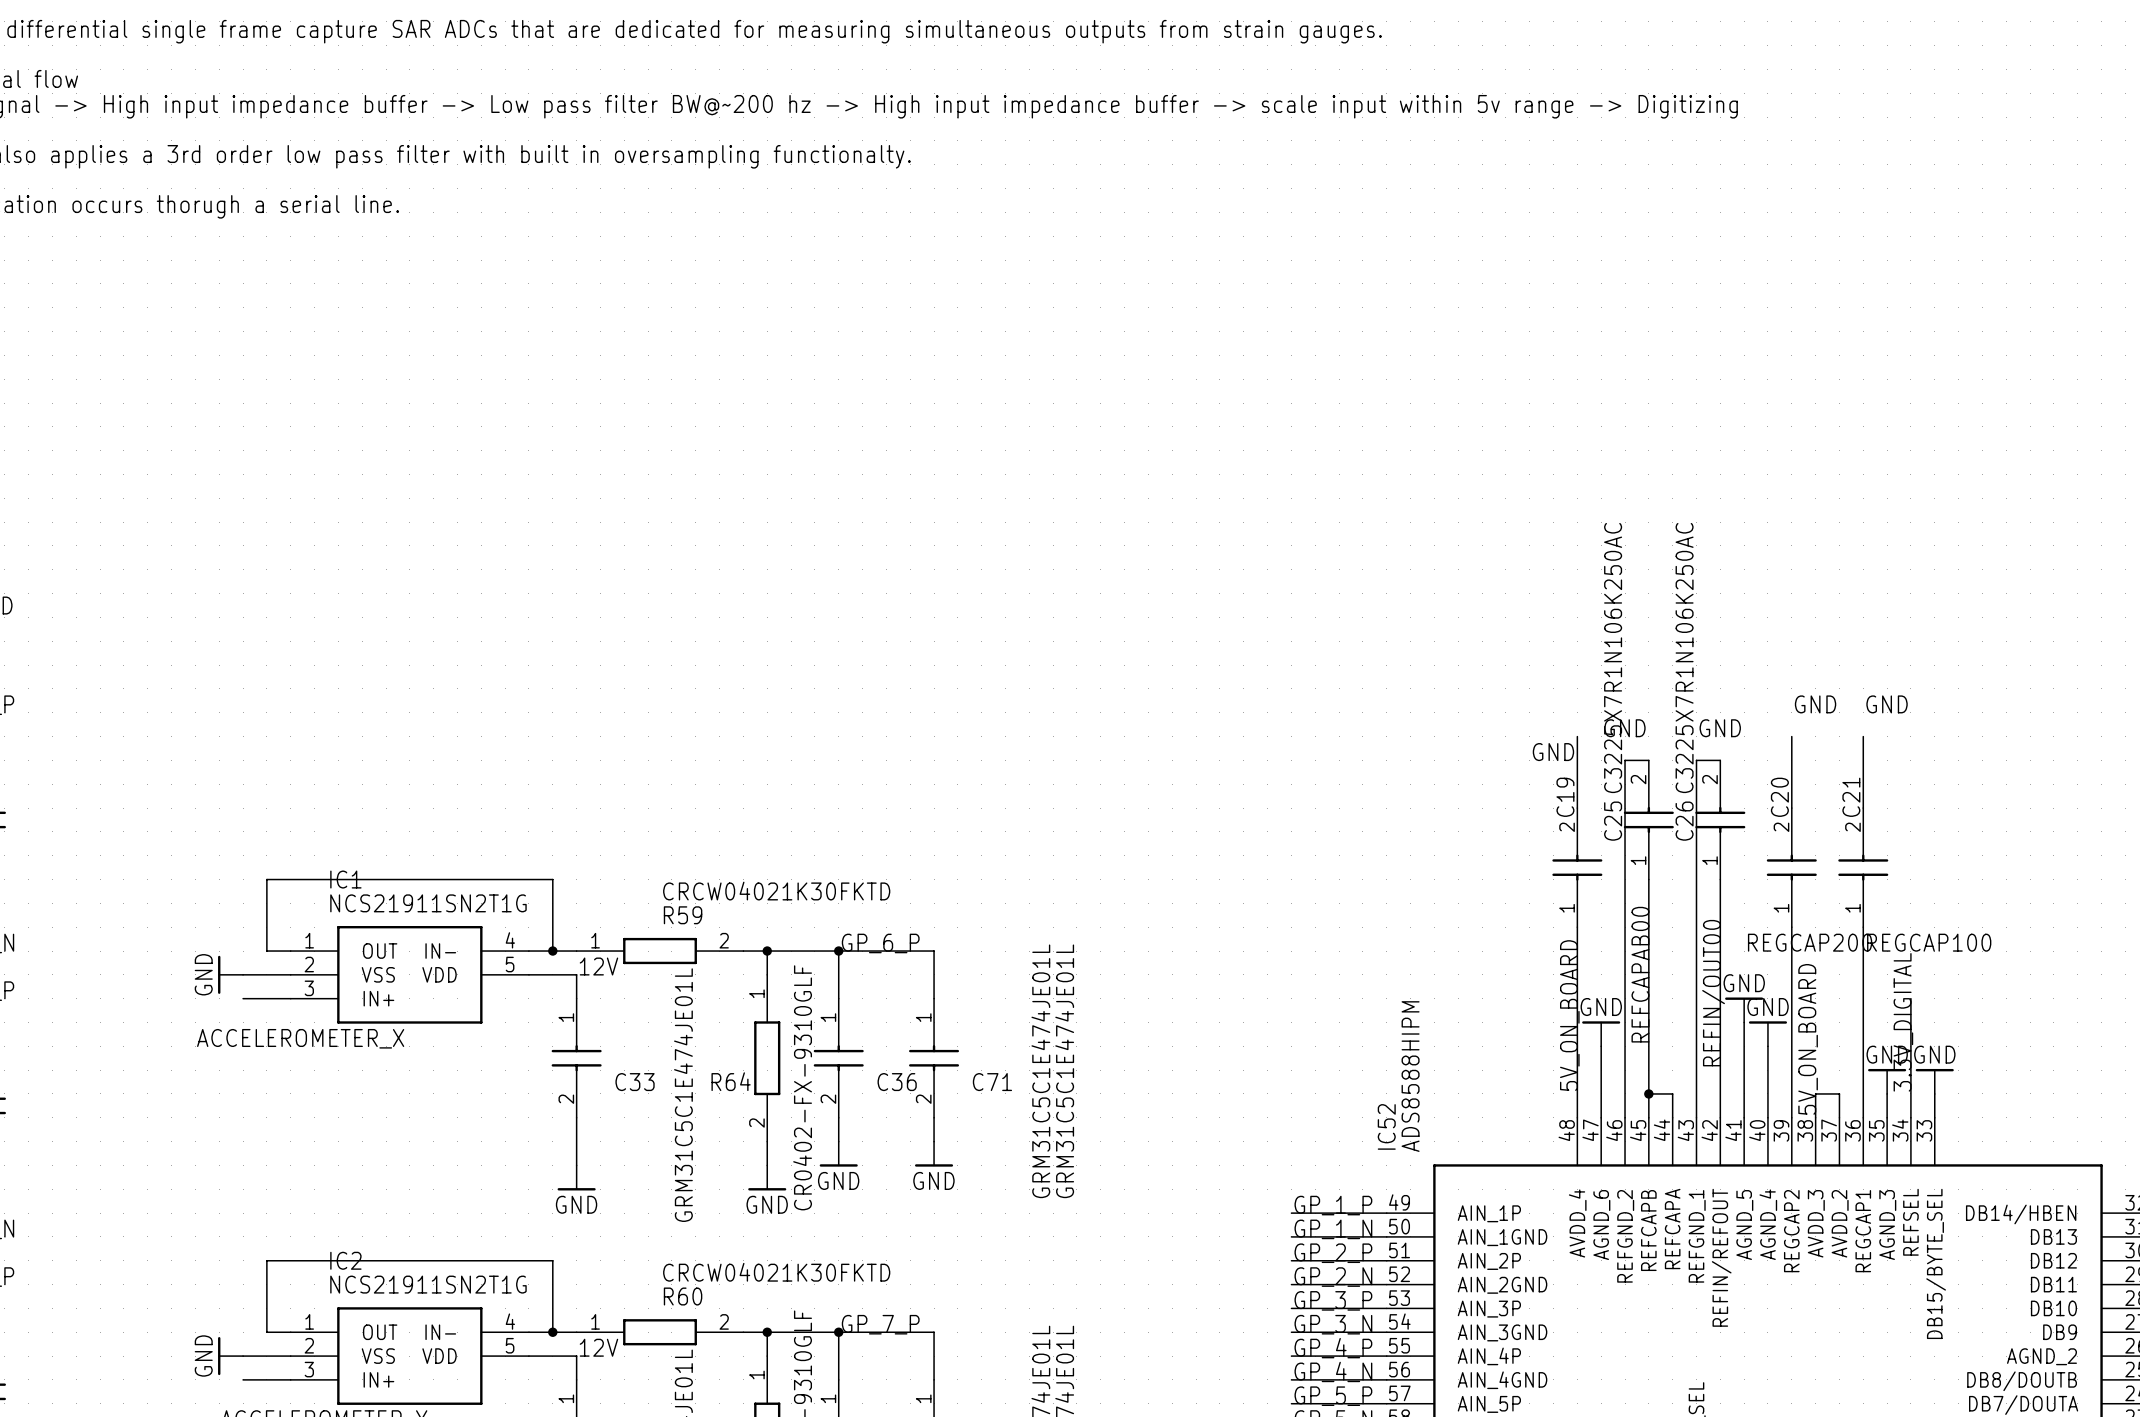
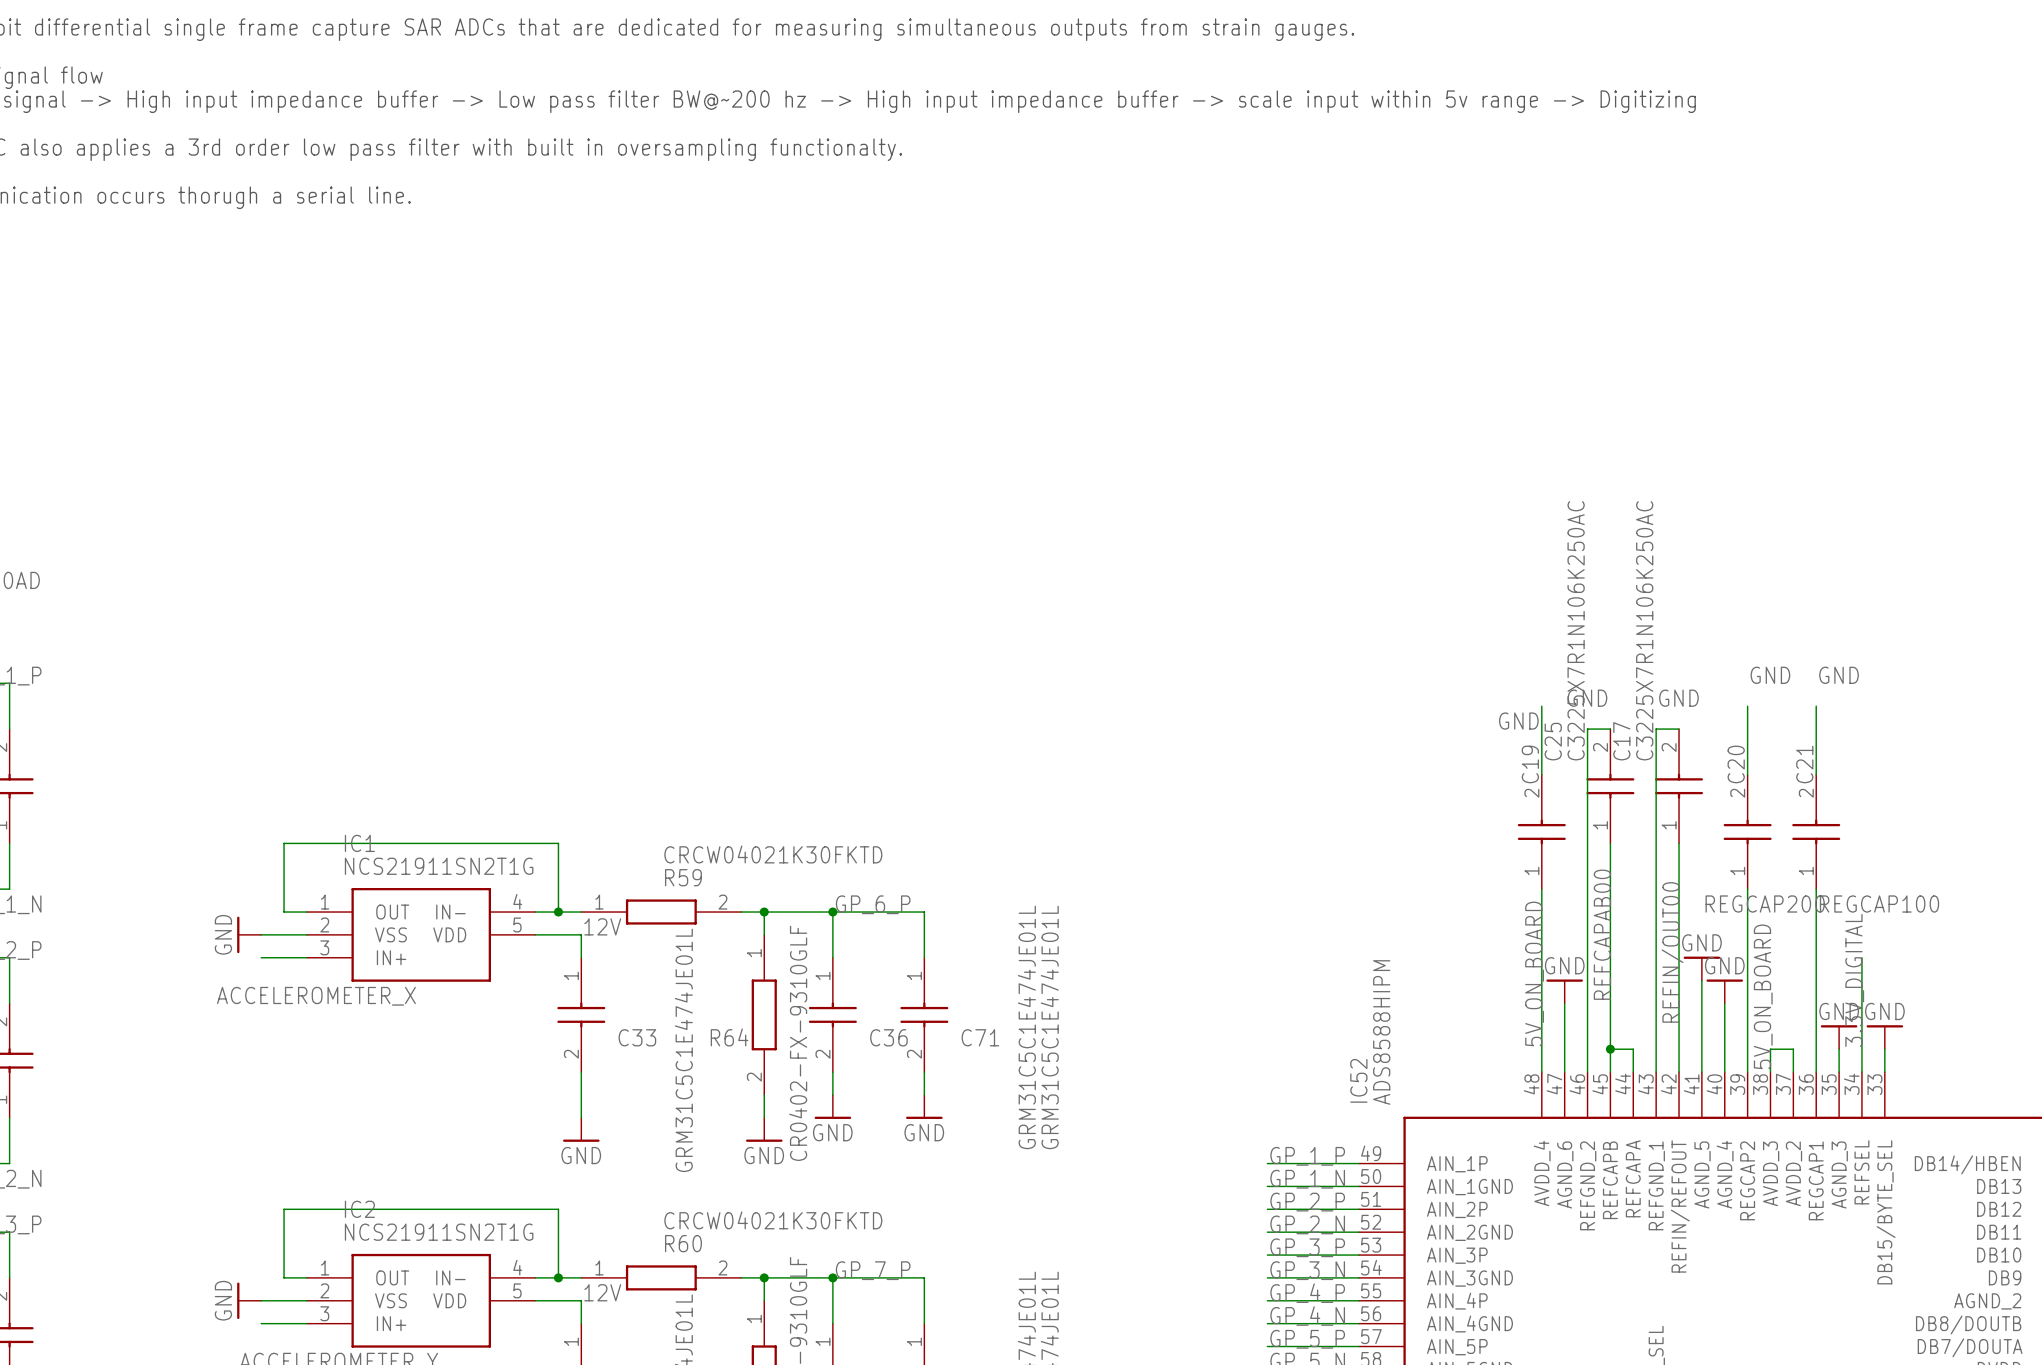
C25 name position: C25 (1613, 821) -> C25 (1553, 741)
C26 name: C26 (1684, 821) -> C17 (1621, 741)

